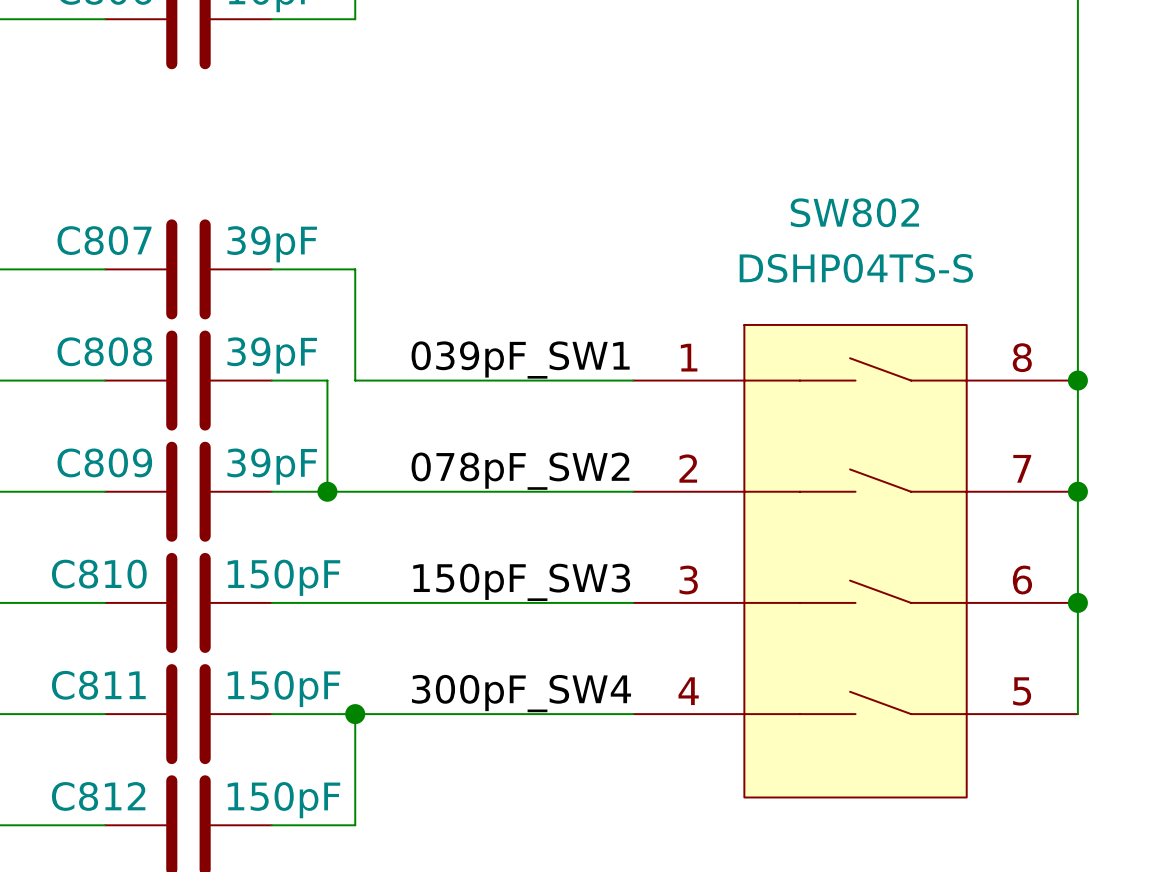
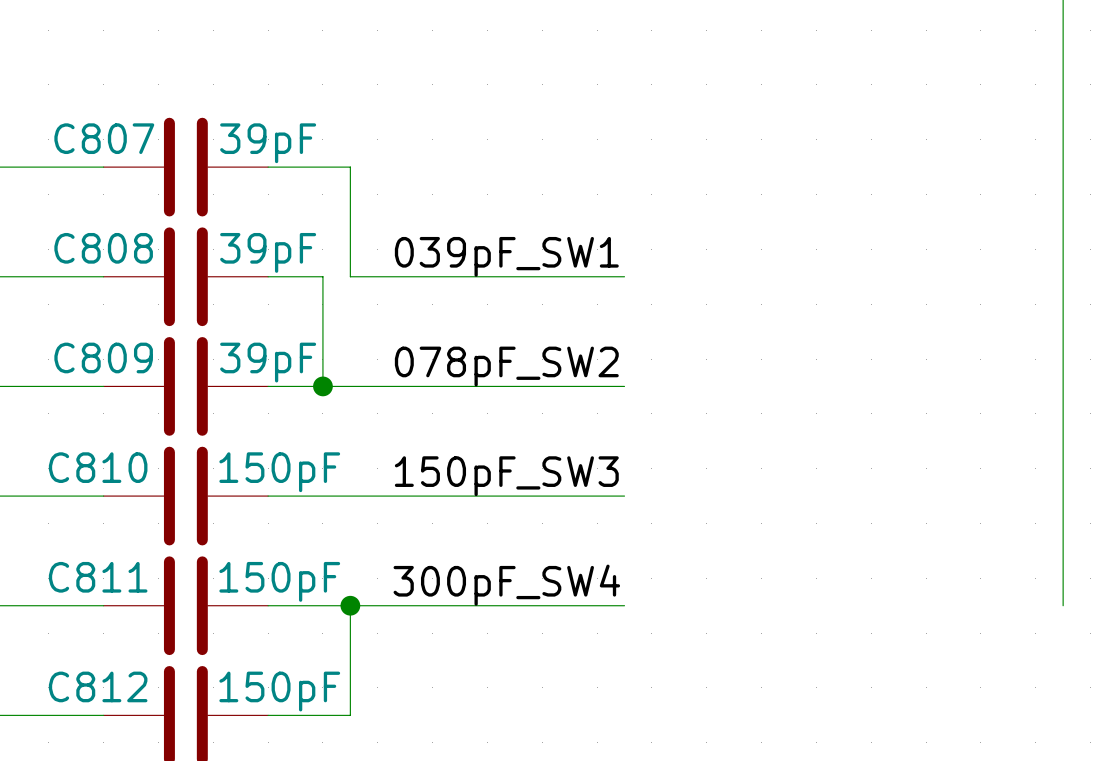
junction: (1077, 380) -> none
junction: (1077, 491) -> none
SW802: DSHP04TS-S (855, 561) -> none
junction: (1077, 602) -> none

